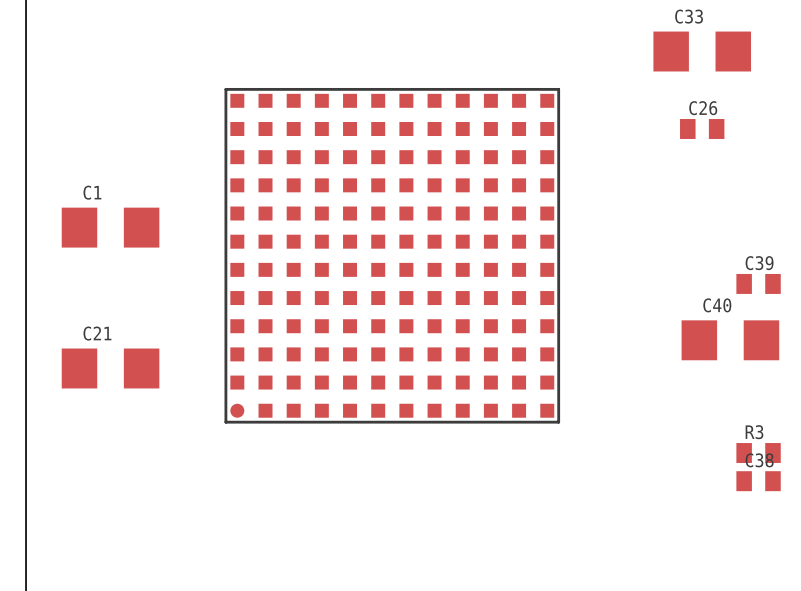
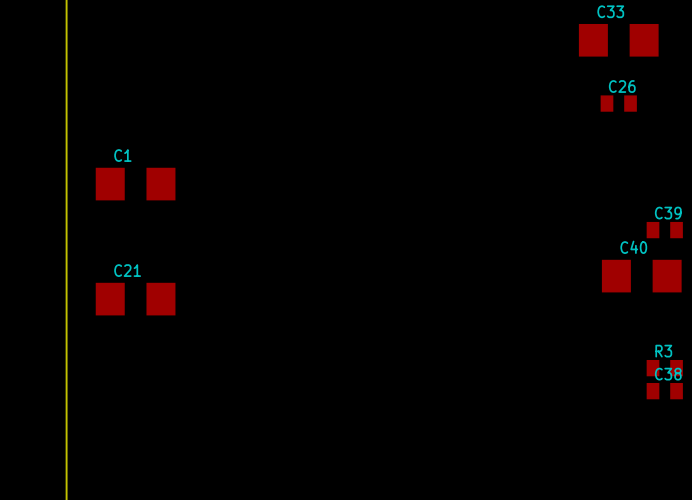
part: (392, 255) -> none

